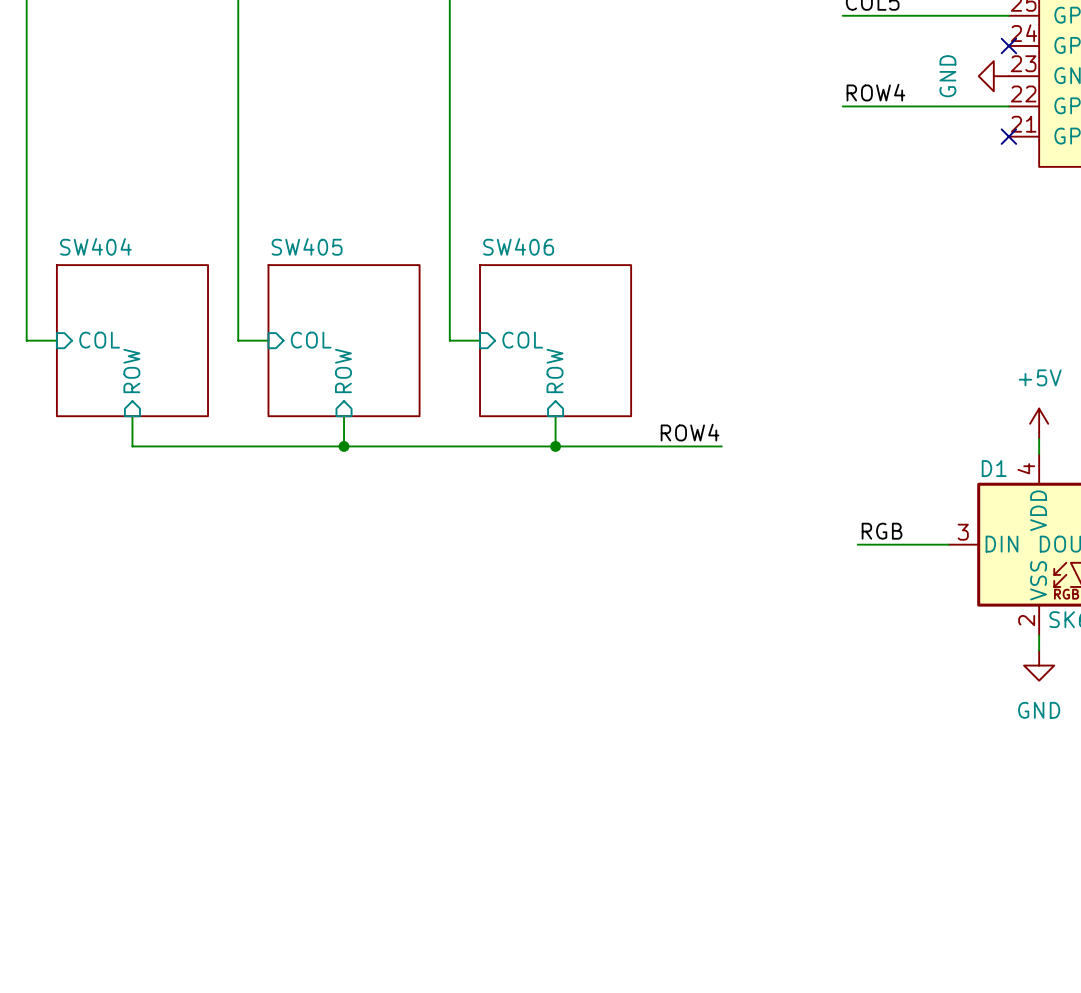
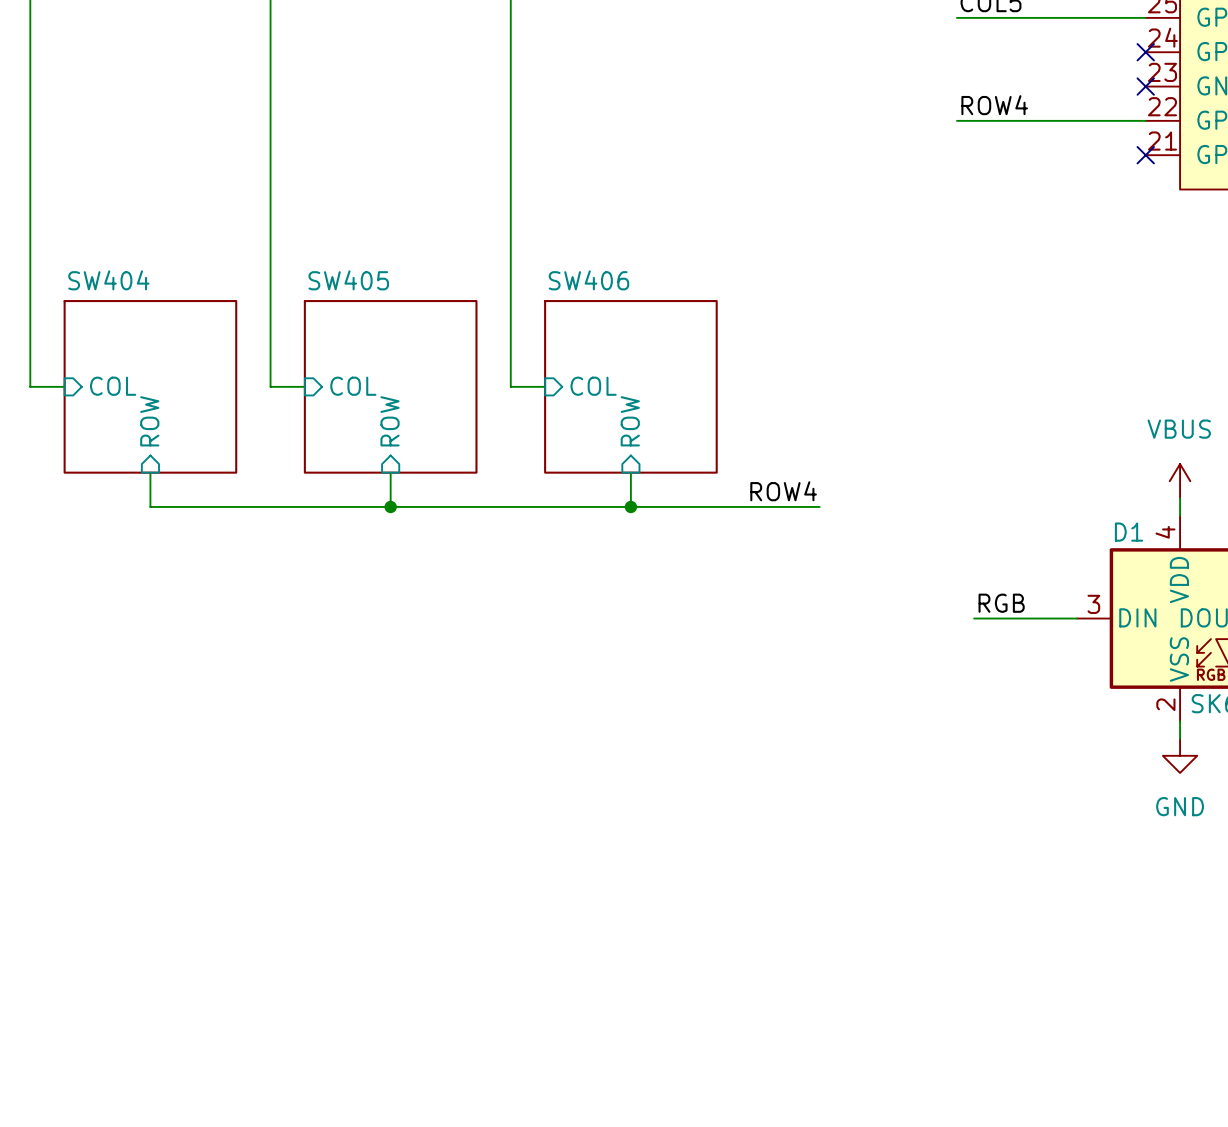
power symbol: GND (993, 76) -> none
no-connect mark: none -> (1145, 86)
power symbol: +5V (1039, 423) -> VBUS (1180, 481)

